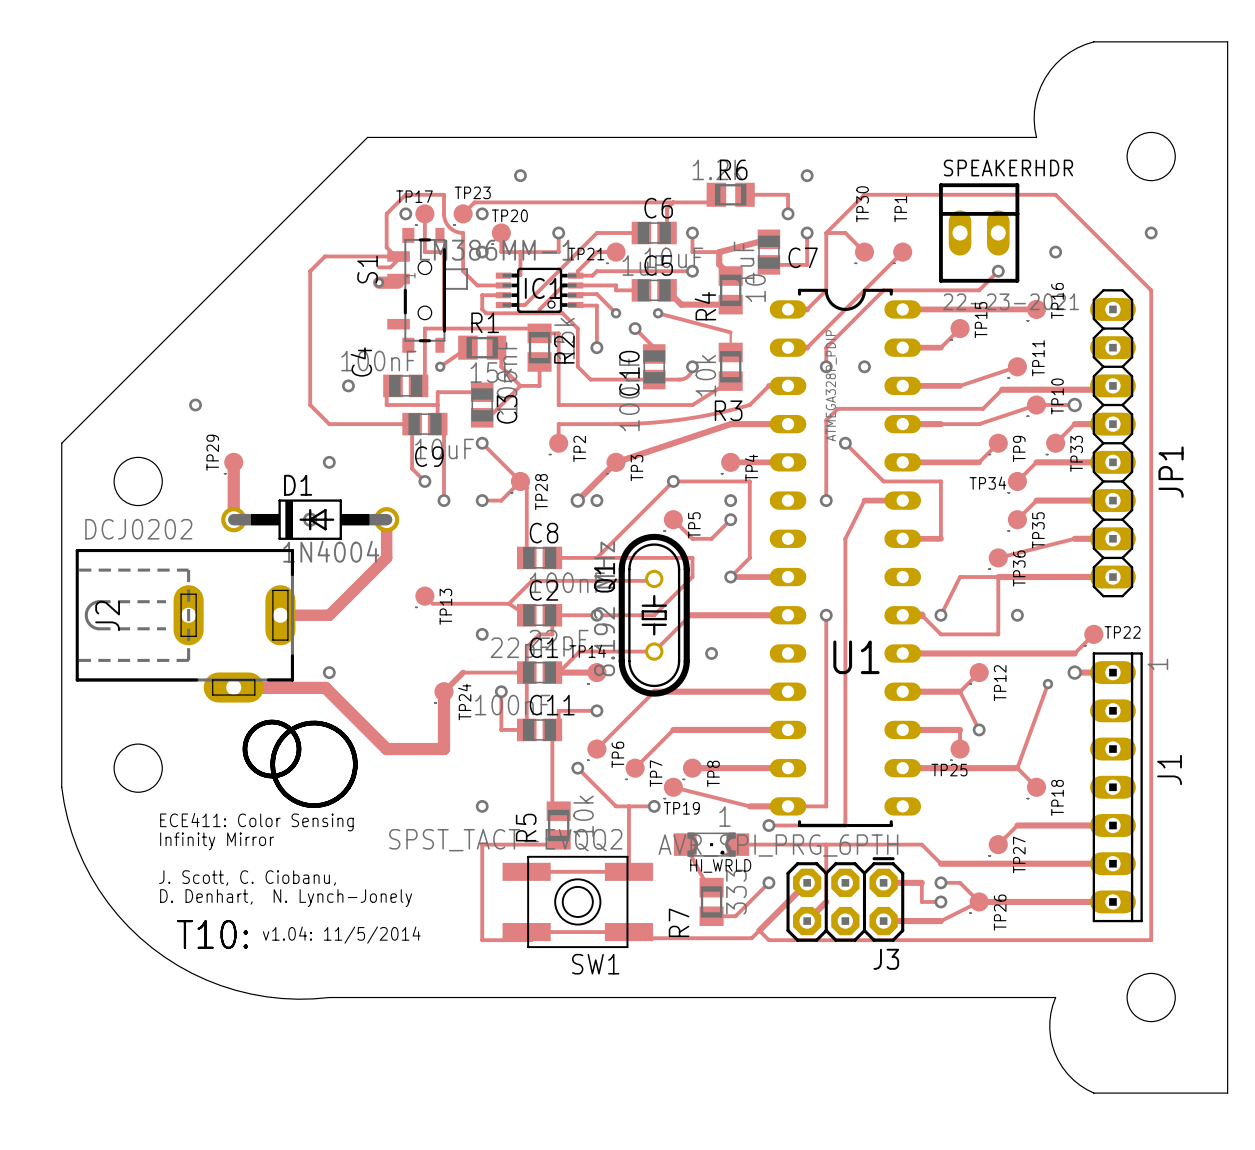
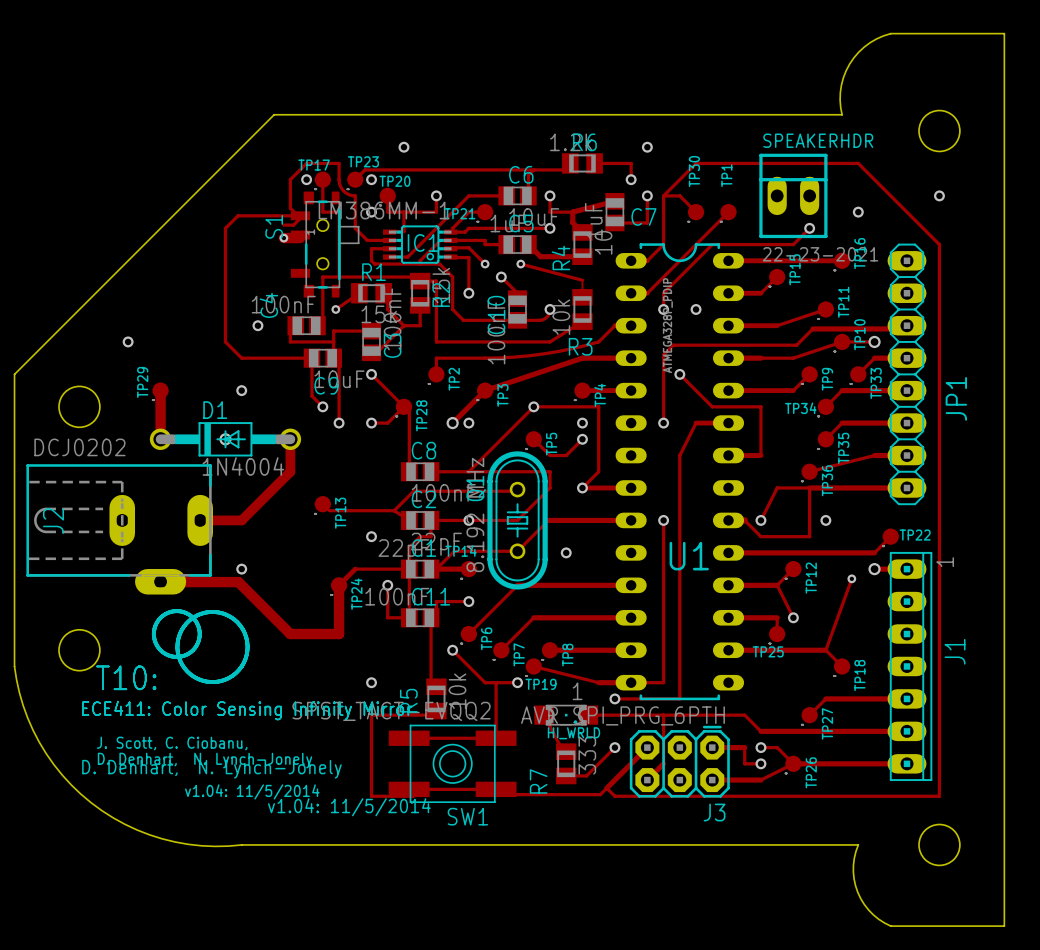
line: (291, 729) (282, 724) (271, 722) (261, 724) (252, 729) (247, 738) (244, 749) (247, 759) (252, 768) -> (193, 617) (185, 612) (176, 611) (168, 612) (160, 617) (155, 625) (153, 634) (155, 642) (160, 650)
line: (291, 729) (305, 723) (315, 723) (330, 726) (343, 735) (351, 747) (355, 762) (354, 773) (348, 787) -> (193, 617) (205, 612) (213, 611) (226, 614) (237, 622) (244, 632) (247, 645) (246, 654) (241, 666)
line: (291, 729) (280, 740) (272, 760) (274, 775) (284, 793) (302, 804) (318, 805) (337, 798) (348, 787) -> (193, 617) (183, 627) (177, 643) (178, 656) (187, 671) (202, 680) (215, 681) (232, 675) (241, 666)
line: (291, 729) (296, 738) (299, 749) (296, 759) (291, 768) (282, 774) (271, 776) (261, 774) (252, 768) -> (193, 617) (198, 625) (199, 634) (198, 642) (193, 650) (185, 655) (176, 656) (168, 655) (160, 650)
line: (291, 729) (282, 724) (271, 722) (261, 724) (252, 729) (247, 738) (244, 749) (247, 759) (252, 768) -> (193, 617) (185, 612) (176, 611) (168, 612) (160, 617) (155, 625) (153, 634) (155, 642) (160, 650)
line: (291, 729) (305, 723) (315, 723) (330, 726) (343, 735) (351, 747) (355, 762) (354, 773) (348, 787) -> (193, 617) (205, 612) (213, 611) (226, 614) (237, 622) (244, 632) (247, 645) (246, 654) (241, 666)
line: (291, 729) (280, 740) (272, 760) (274, 775) (284, 793) (302, 804) (318, 805) (337, 798) (348, 787) -> (193, 617) (183, 627) (177, 643) (178, 656) (187, 671) (202, 680) (215, 681) (232, 675) (241, 666)
line: (291, 729) (296, 738) (299, 749) (296, 759) (291, 768) (282, 774) (271, 776) (261, 774) (252, 768) -> (193, 617) (198, 625) (199, 634) (198, 642) (193, 650) (185, 655) (176, 656) (168, 655) (160, 650)
text: ECE411: Color Sensing (256, 822) -> ECE411: Color Sensing Infinity Mirror (247, 710)
text: Infinity Mirror (217, 841) -> none
text: none -> D. Denhart, N. Lynch-Jonely (211, 769)
text position: T10: (212, 934) -> T10: (126, 677)
text: none -> v1.04: 11/5/2014 (349, 807)

